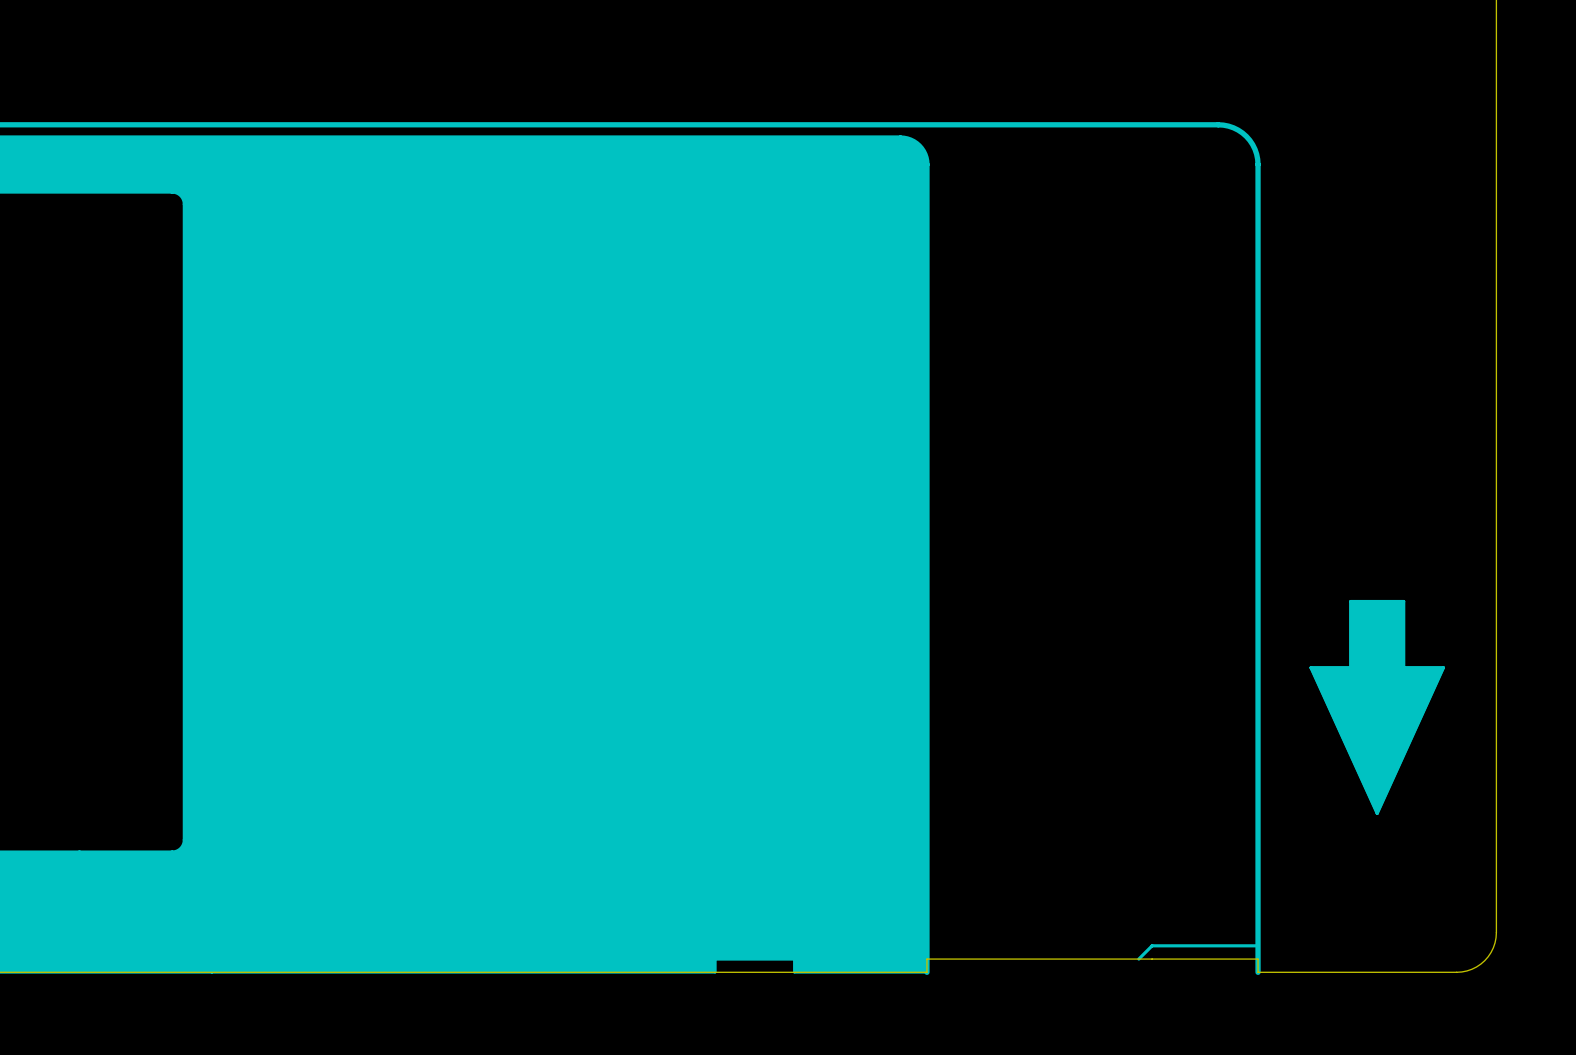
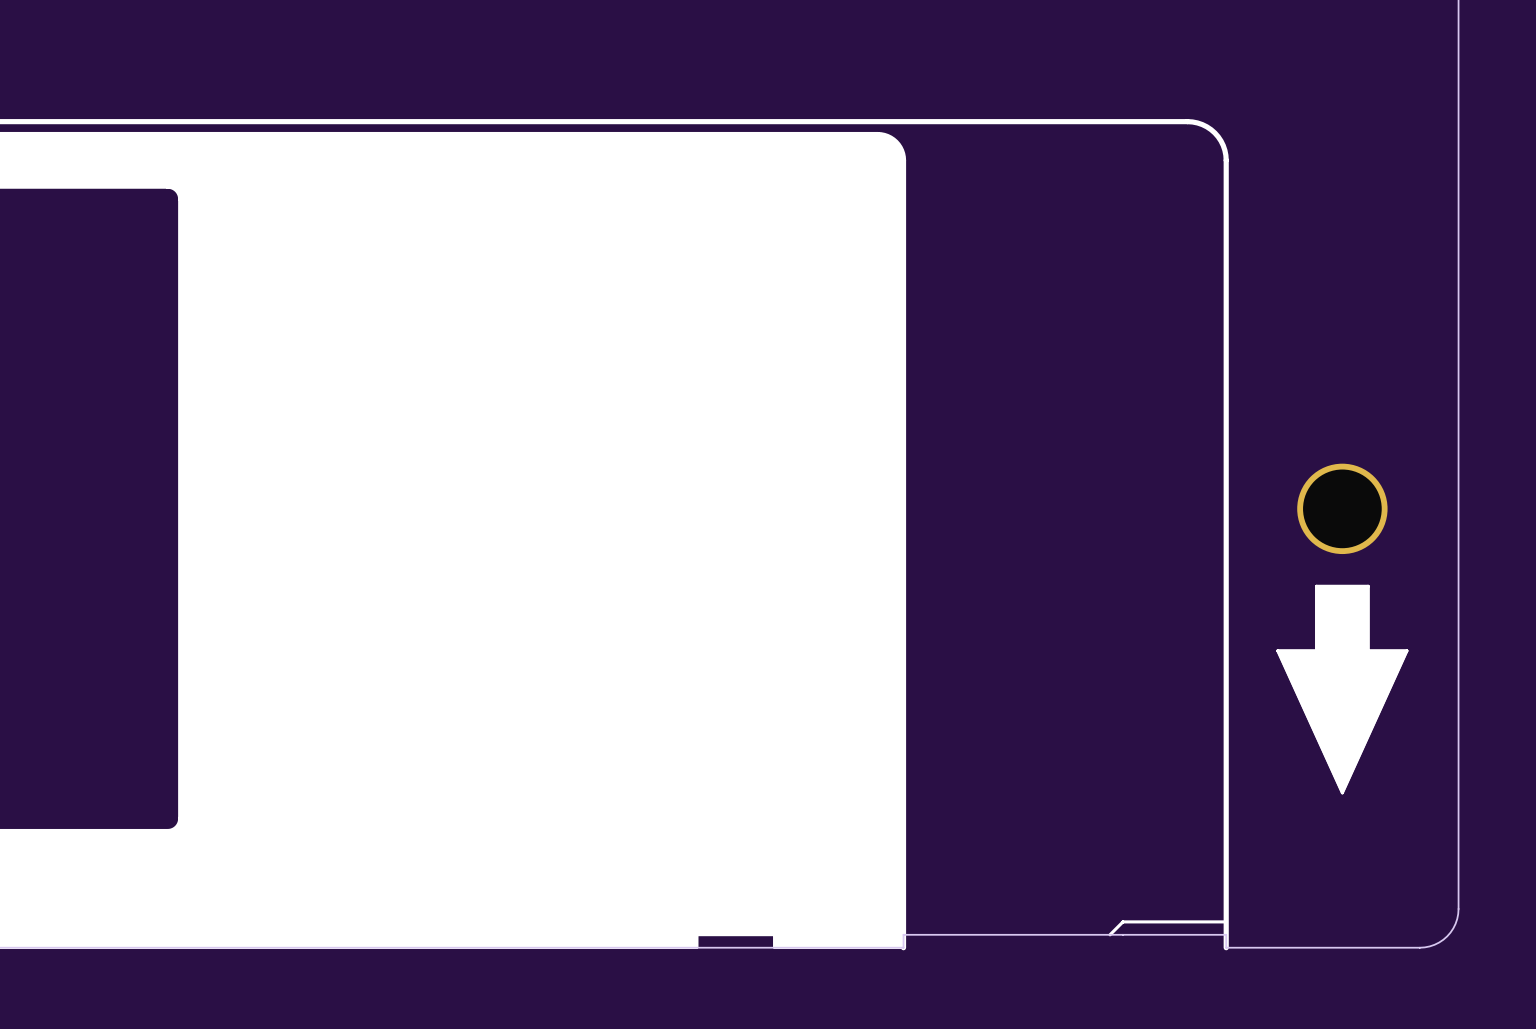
part: none -> (1342, 508)

